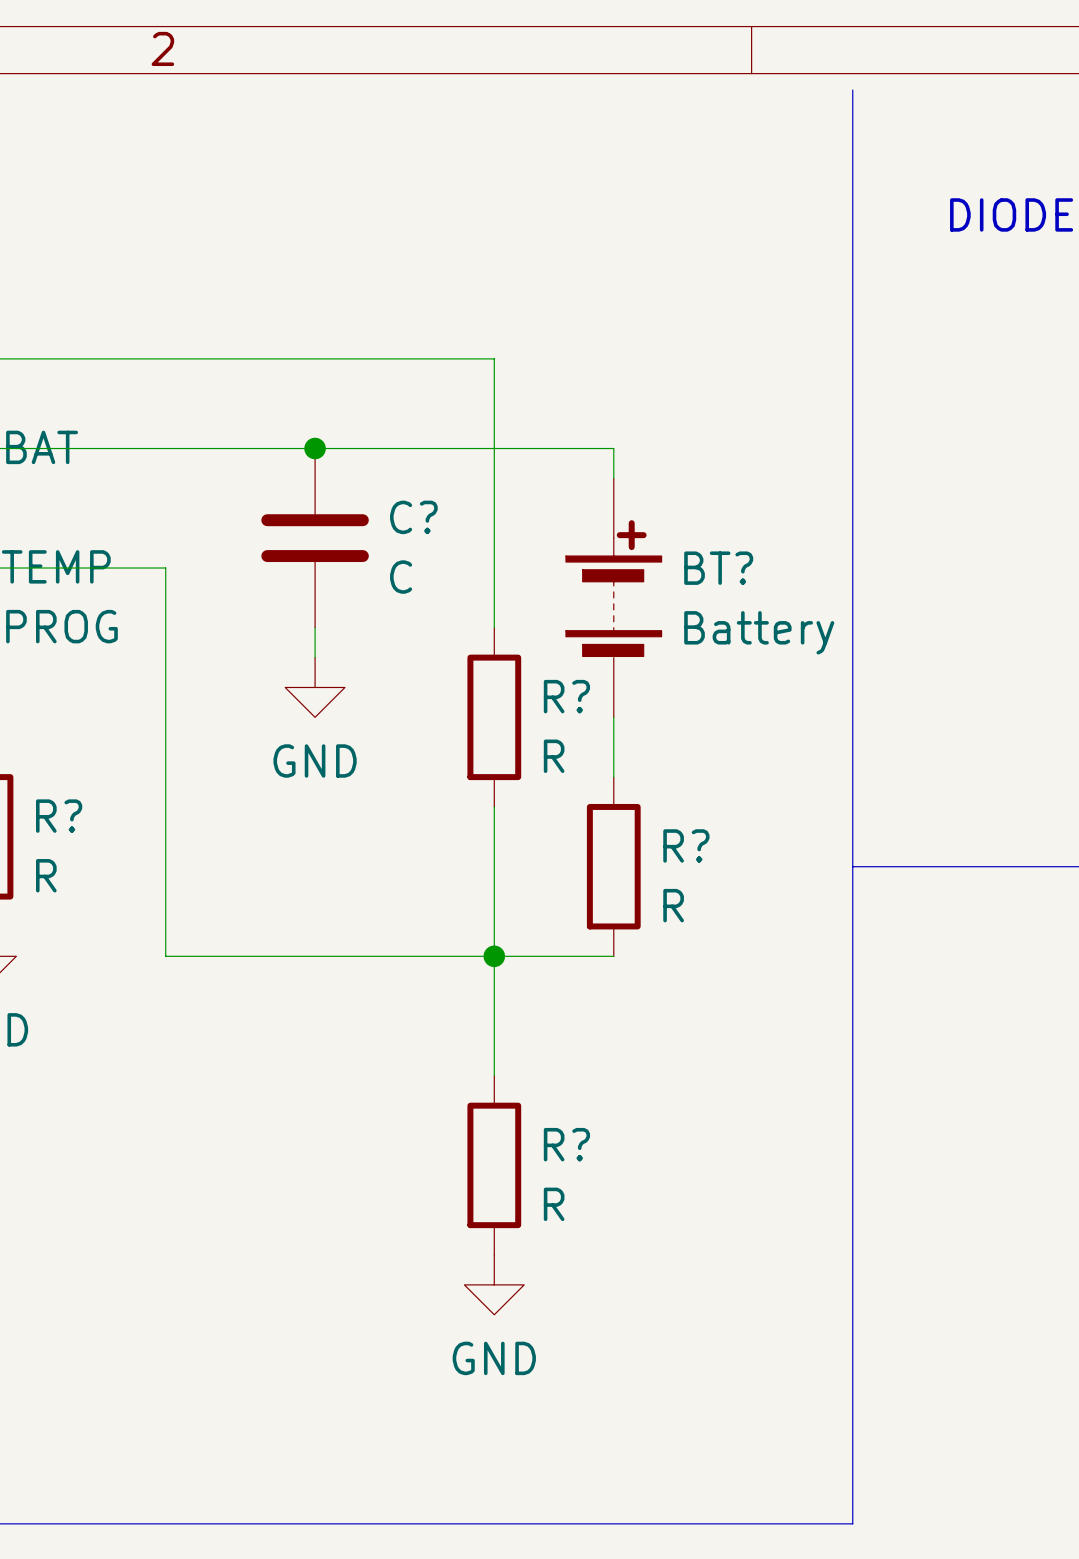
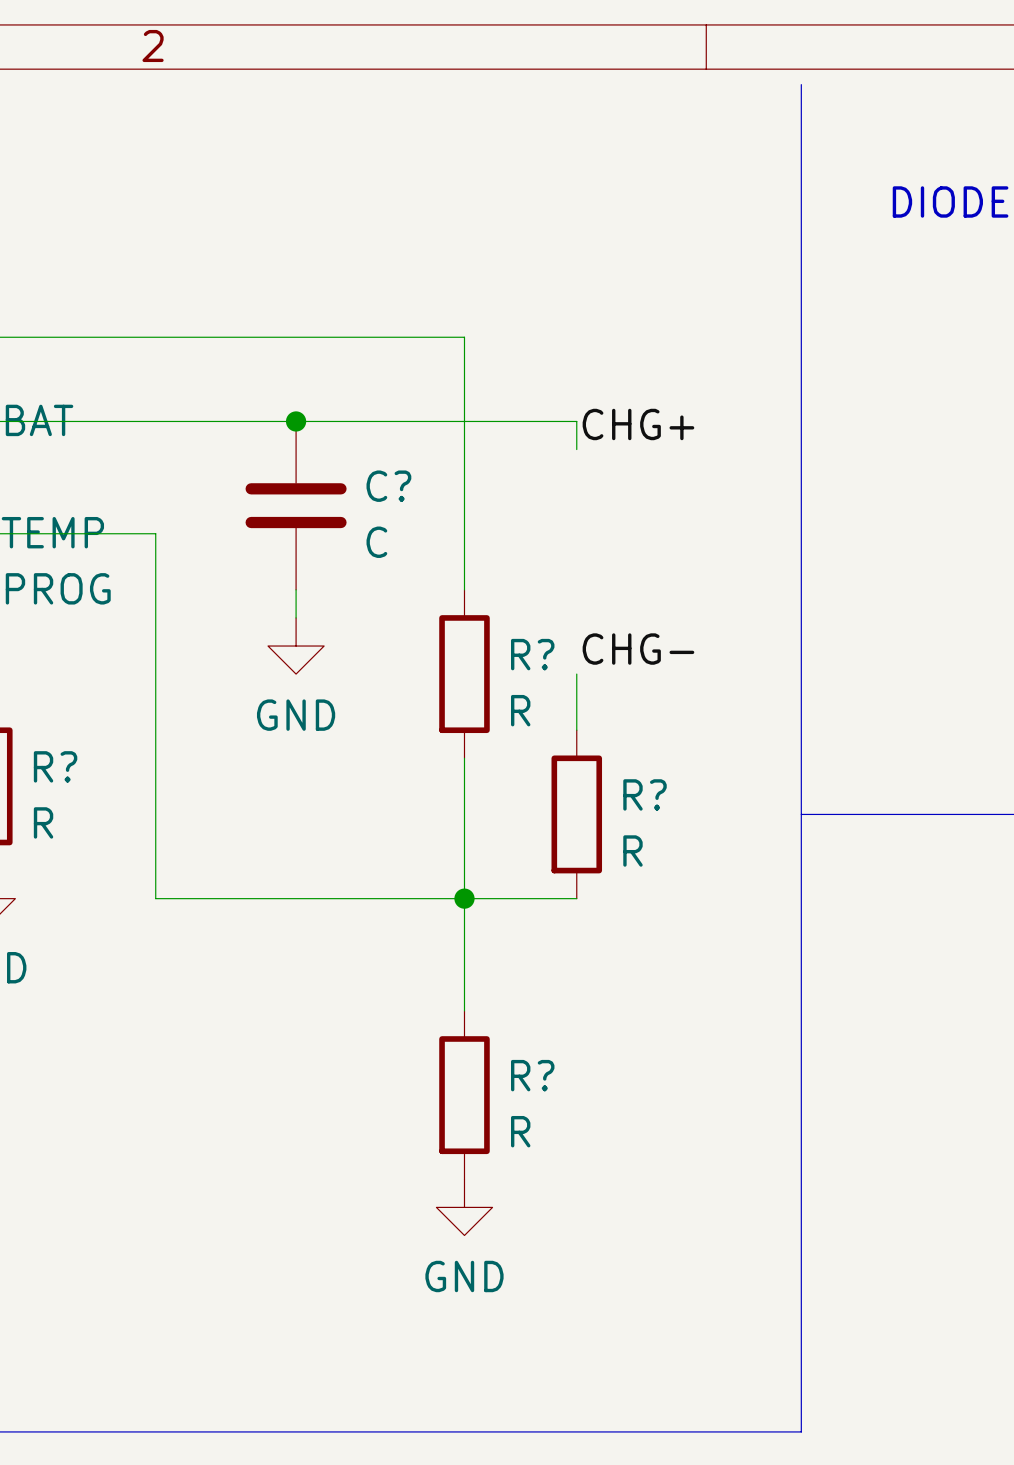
label: none -> CHG+ (638, 424)
BT?: Battery (613, 597) -> none
label: none -> CHG- (638, 649)

